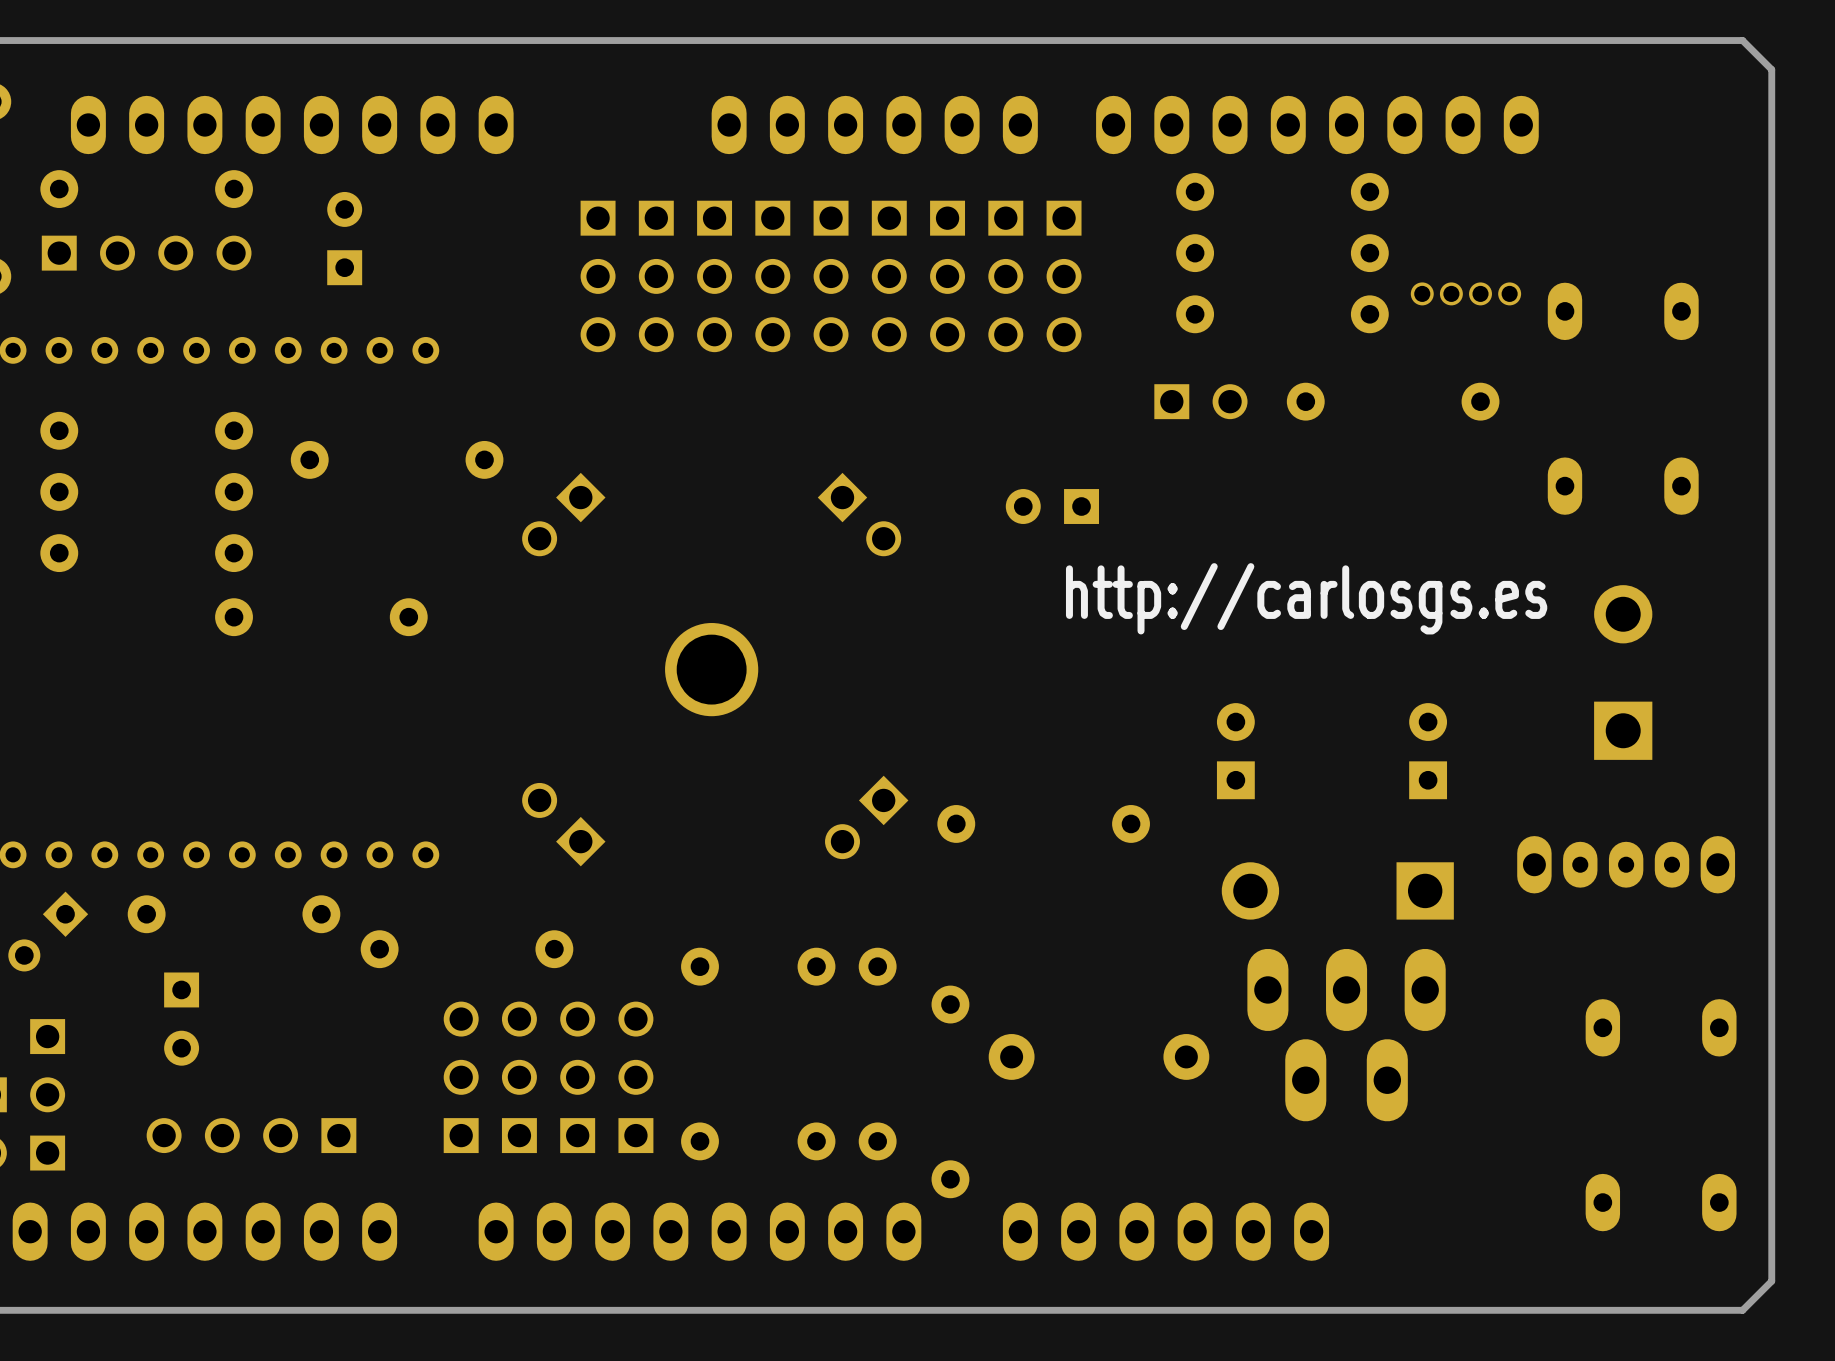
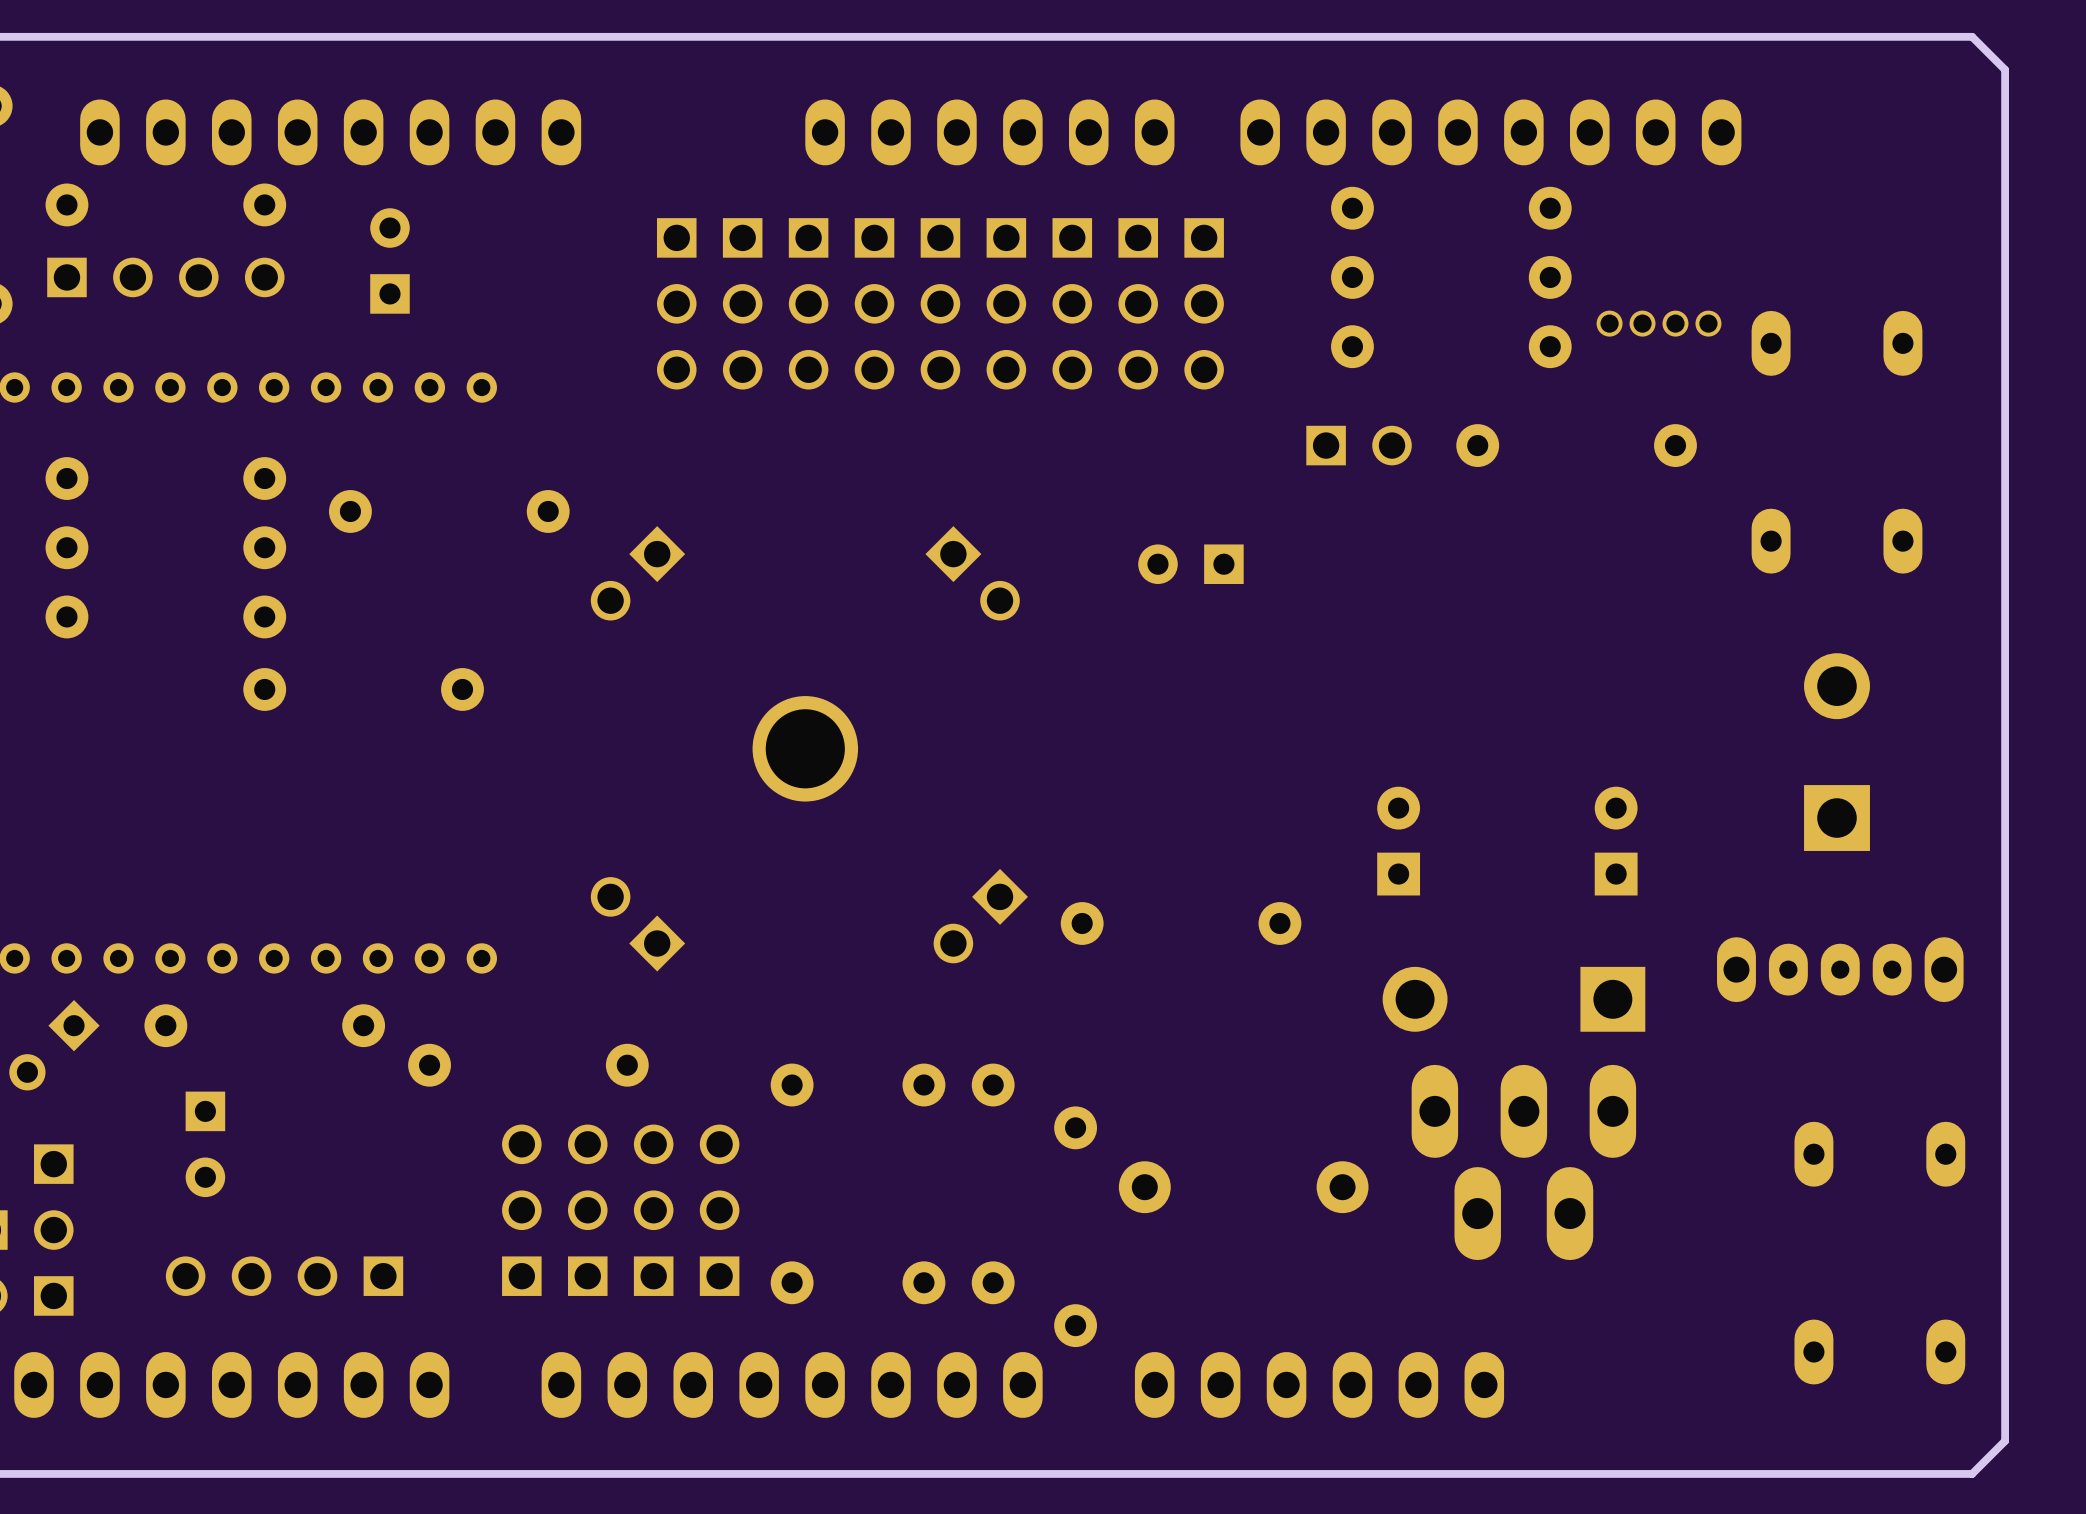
text: http://carlosgs.es (1306, 598) -> none

